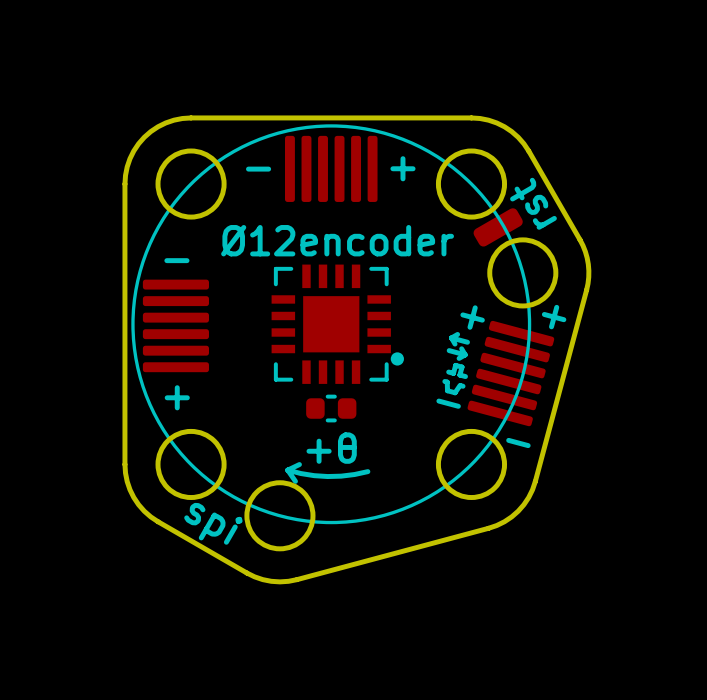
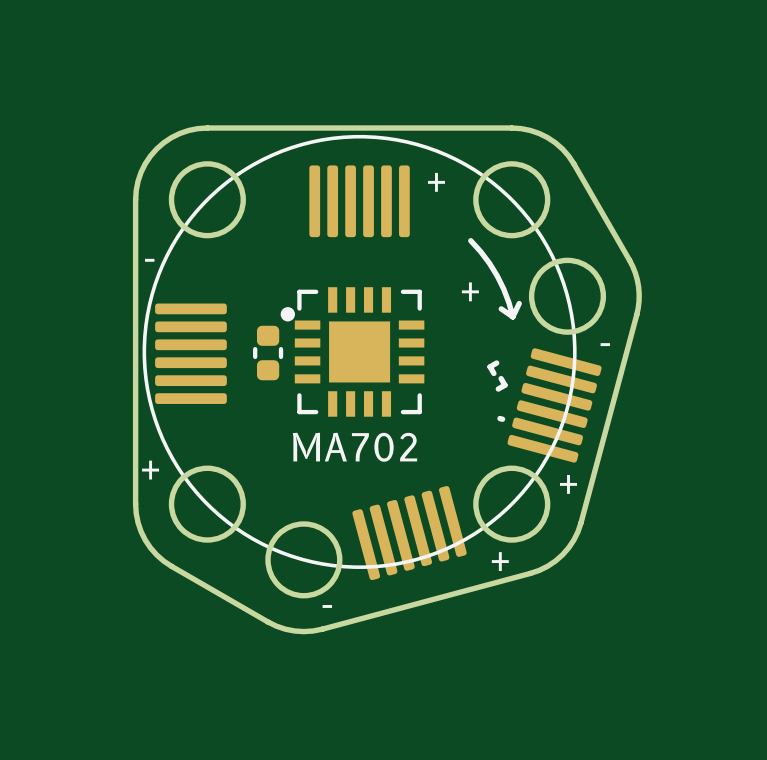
part position: (331, 168) -> (359, 201)
text: - (258, 169) -> none
text: rst (533, 203) -> none
line: none -> (470, 240) (497, 275) (512, 316)
part: (498, 227) -> none
text: Ø12encoder (337, 240) -> none
text position: - (176, 260) -> - (149, 260)
line: none -> (519, 303) (512, 316)
line: none -> (501, 308) (512, 316)
text rotation: 0° (472, 317) -> 165° clockwise (470, 291)
text: + (554, 317) -> - (605, 344)
part rotation: 0° (337, 324) -> 180° (352, 351)
line: (451, 337) (467, 342) -> none
line: (449, 350) (465, 354) -> none
line: (448, 372) (453, 373) (455, 365) (462, 367) (459, 375) (465, 376) -> none
line: (444, 381) (447, 382) (447, 390) (455, 392) (460, 385) -> none
text position: + (177, 397) -> + (150, 470)
text: - (448, 403) -> none
part rotation: 0° (331, 408) -> 90° clockwise (268, 353)
part position: (331, 408) -> (268, 353)
text: none -> MA702 (355, 447)
text: - (518, 442) -> + (568, 484)
text: +θ (331, 448) -> none
line: (299, 464) (287, 470) -> none
line: (287, 470) (295, 481) -> none
line: (287, 470) (327, 476) (367, 471) -> none
part: none -> (409, 533)
text: none -> + (500, 561)
text: spi (213, 523) -> none
text: none -> - (327, 606)

